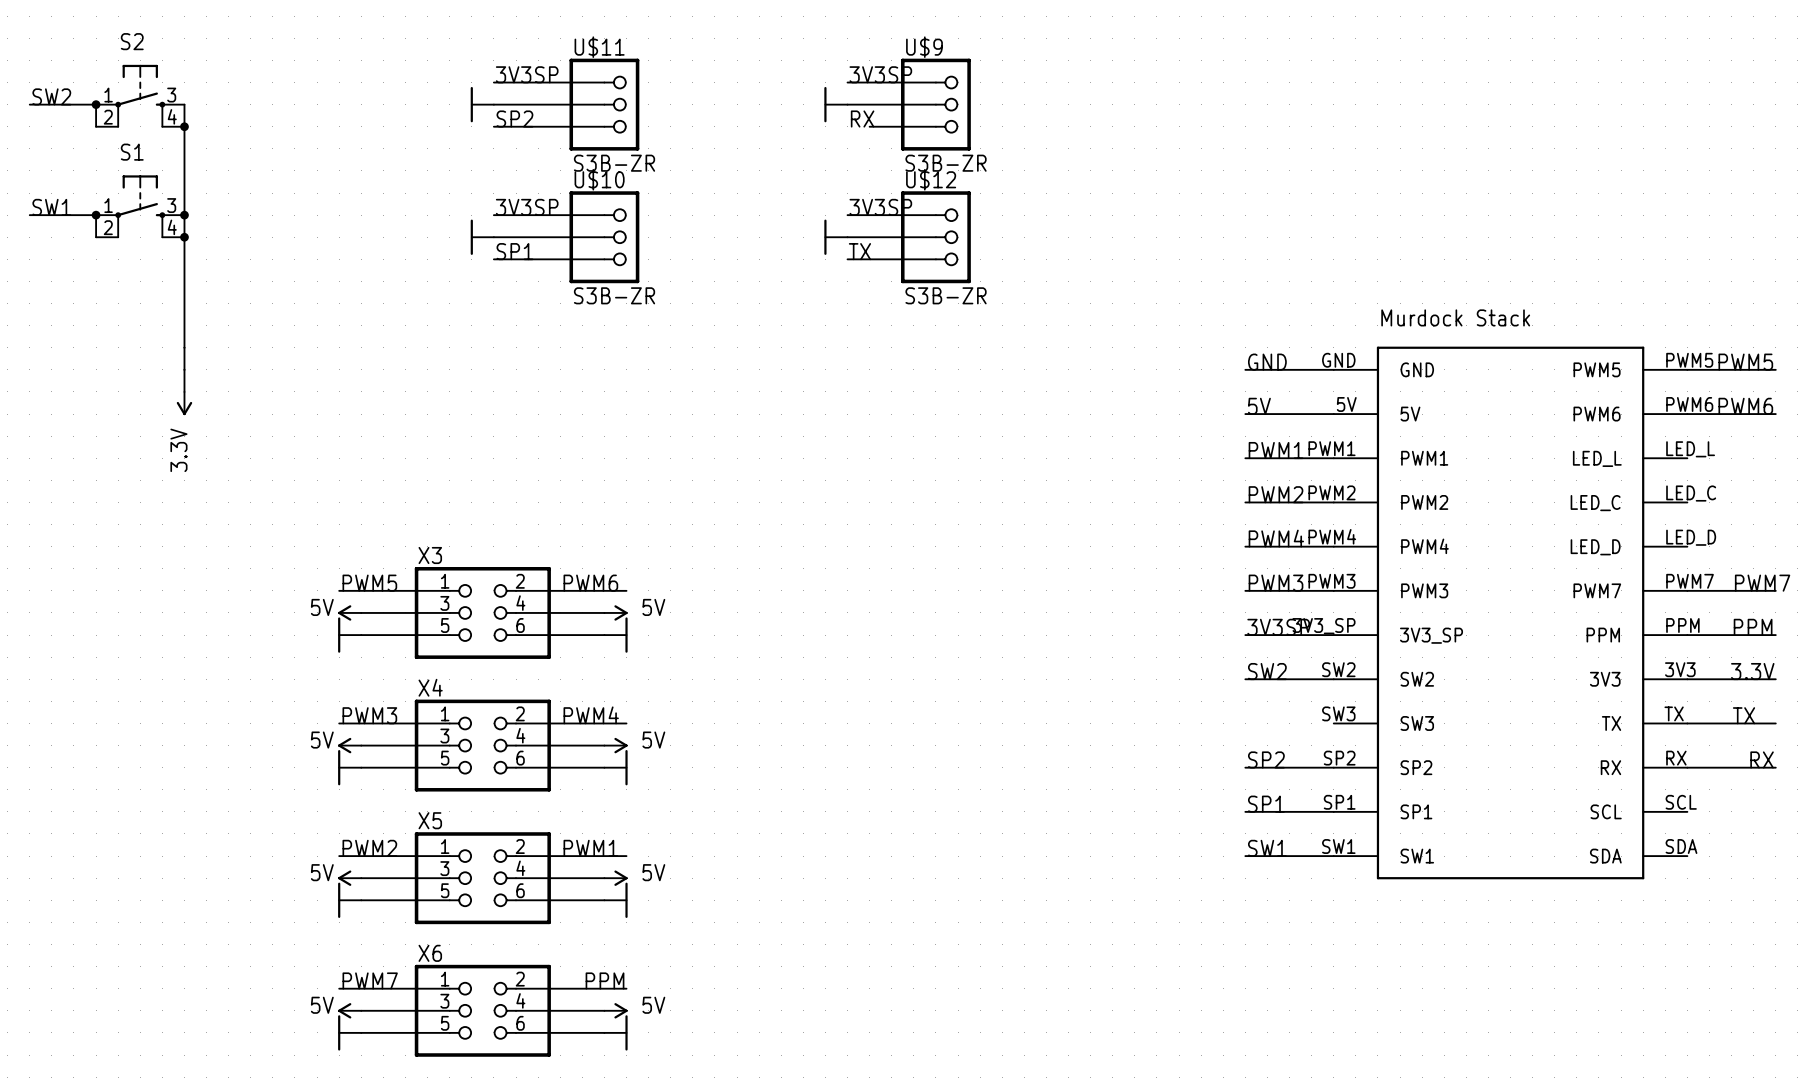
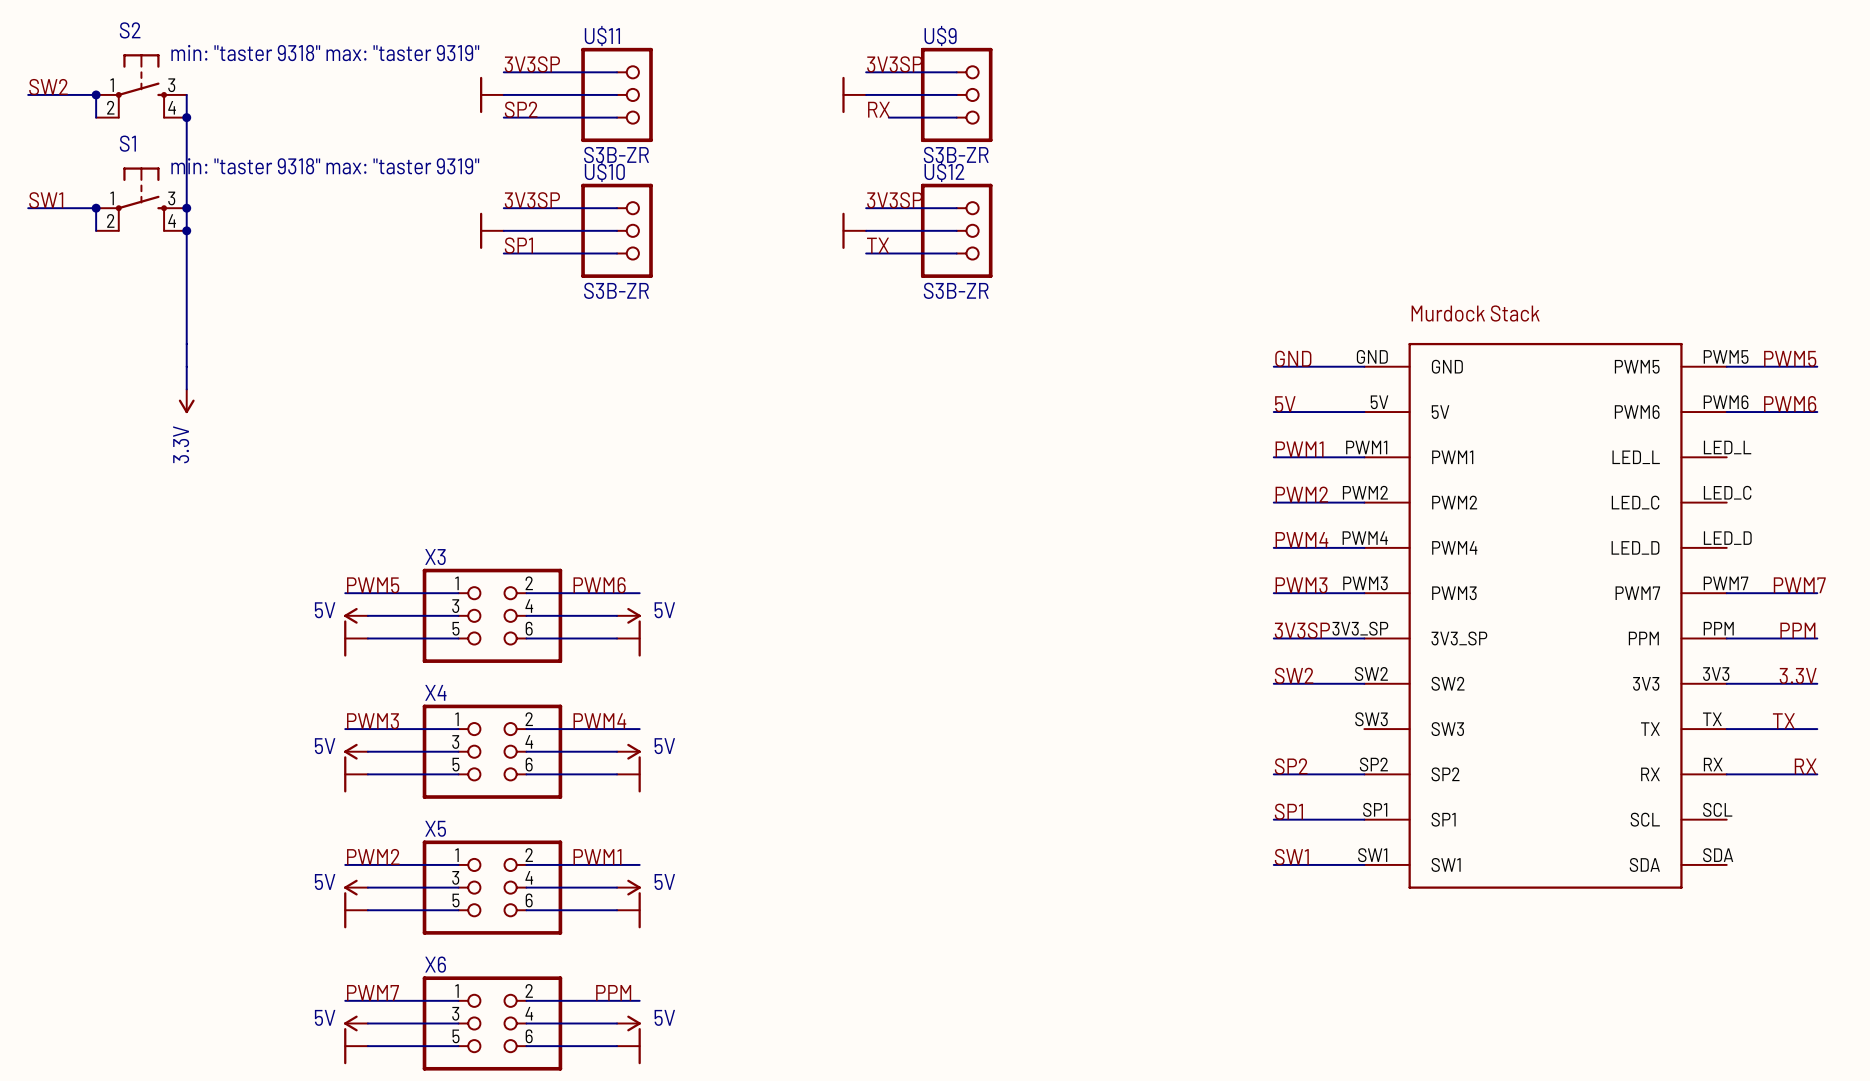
S2 value: none -> min: "taster 9318" max: "taster 9319" (325, 53)
S1 value: none -> min: "taster 9318" max: "taster 9319" (325, 166)

